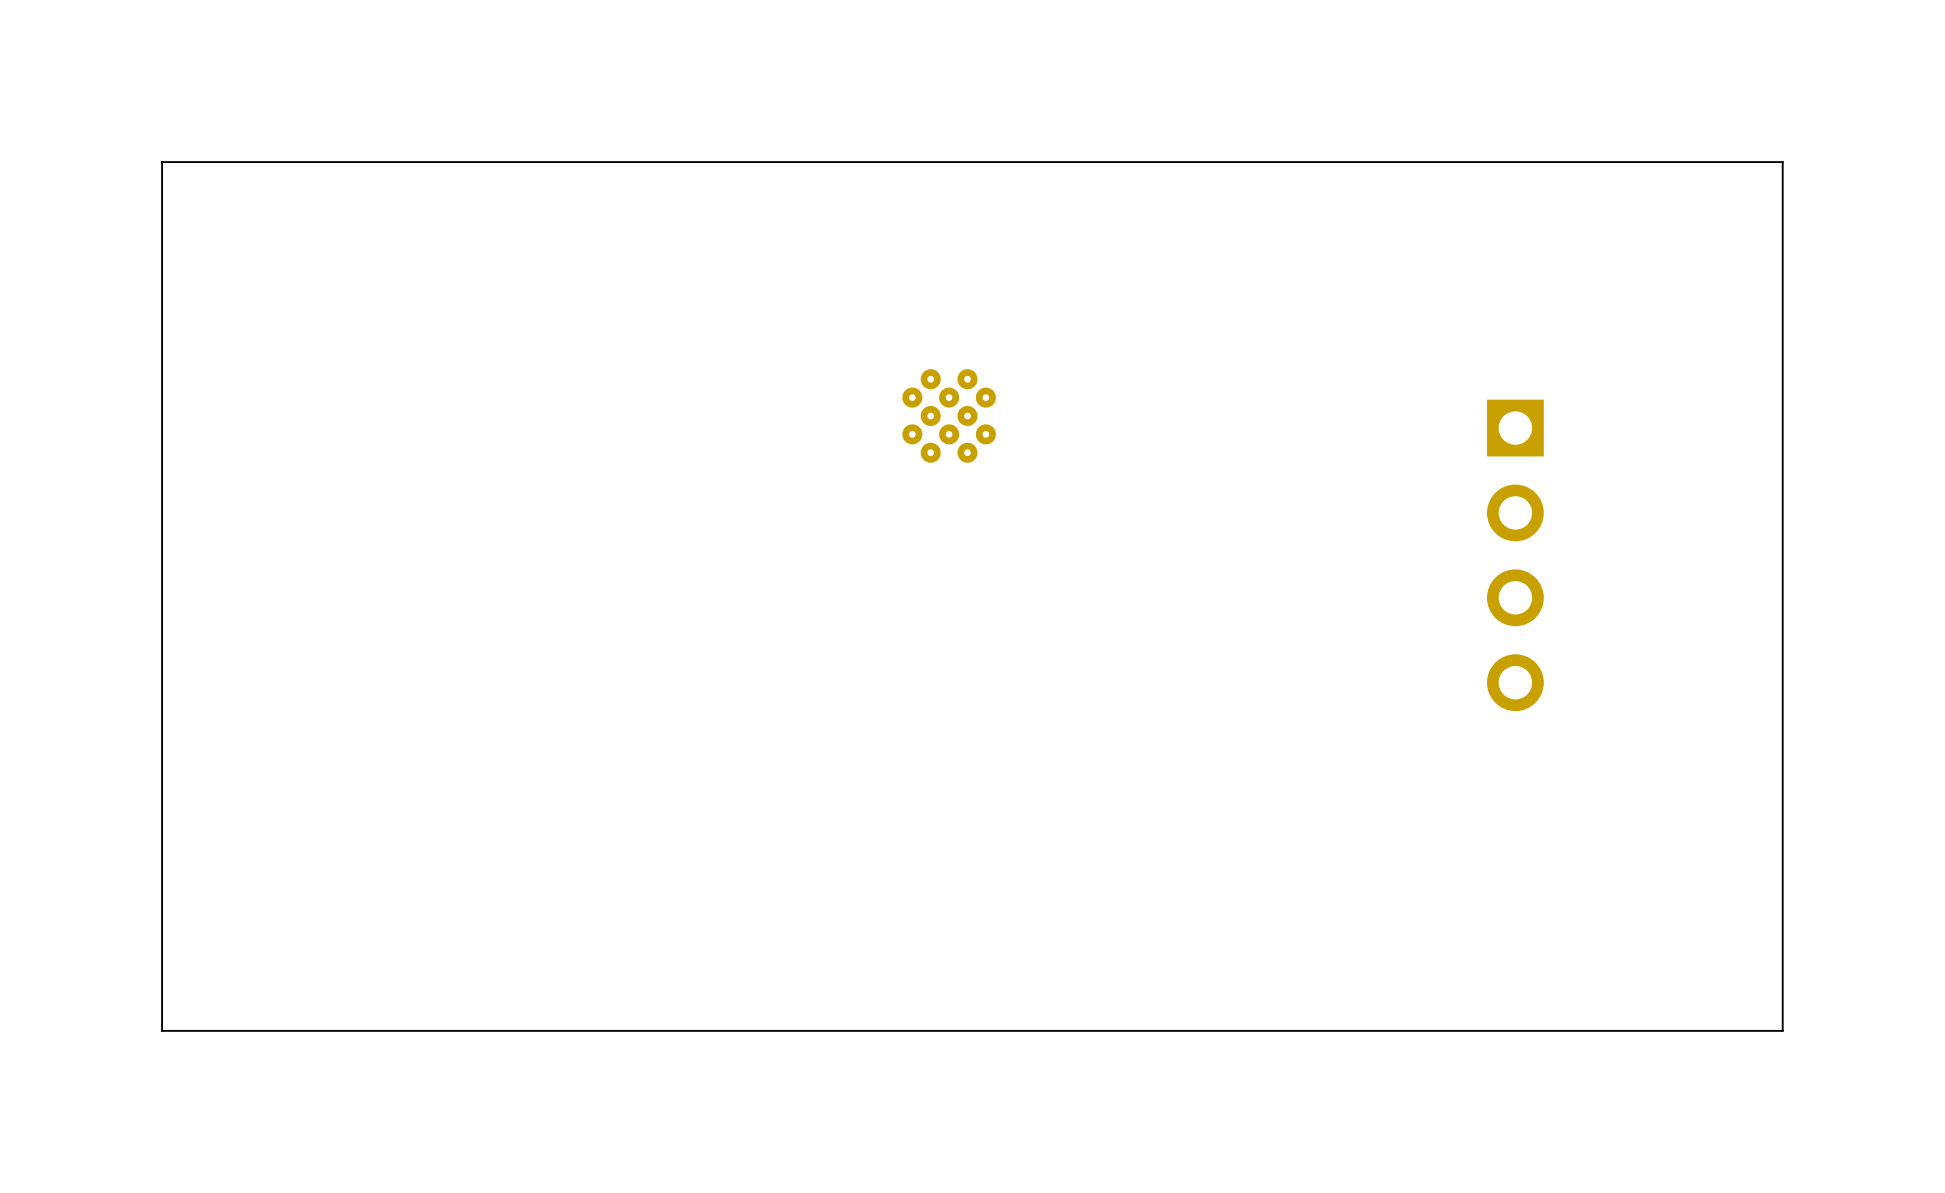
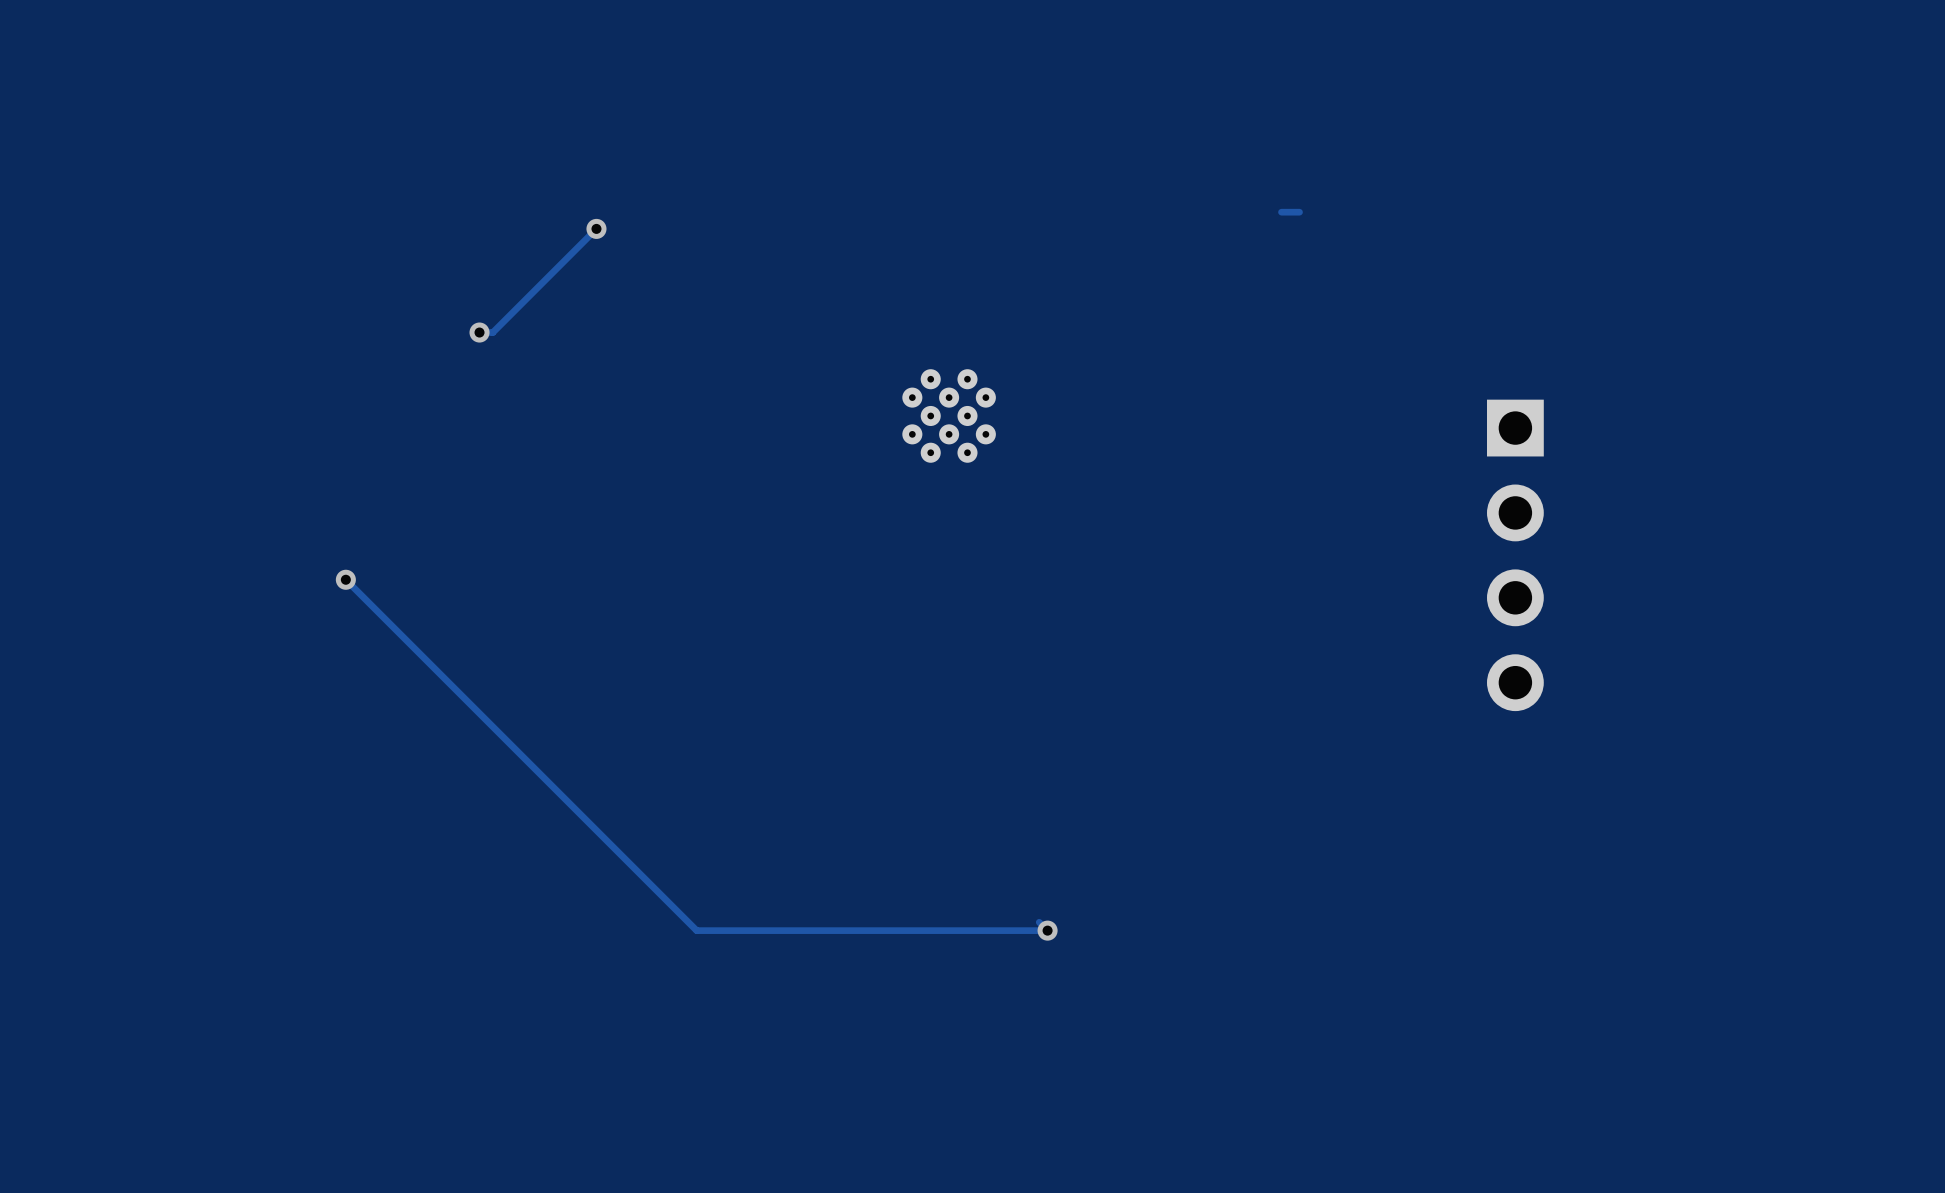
board edge: (1782, 162) (162, 162) (162, 1030) (1782, 1030) (1782, 162) -> none
track: none -> (1299, 212) (1281, 212)
track: none -> (596, 228) (492, 332) (479, 332)
via: none -> (596, 228)
via: none -> (479, 332)
track: none -> (345, 579) (696, 930) (1047, 930) (1039, 922)
via: none -> (345, 579)
via: none -> (1047, 930)

